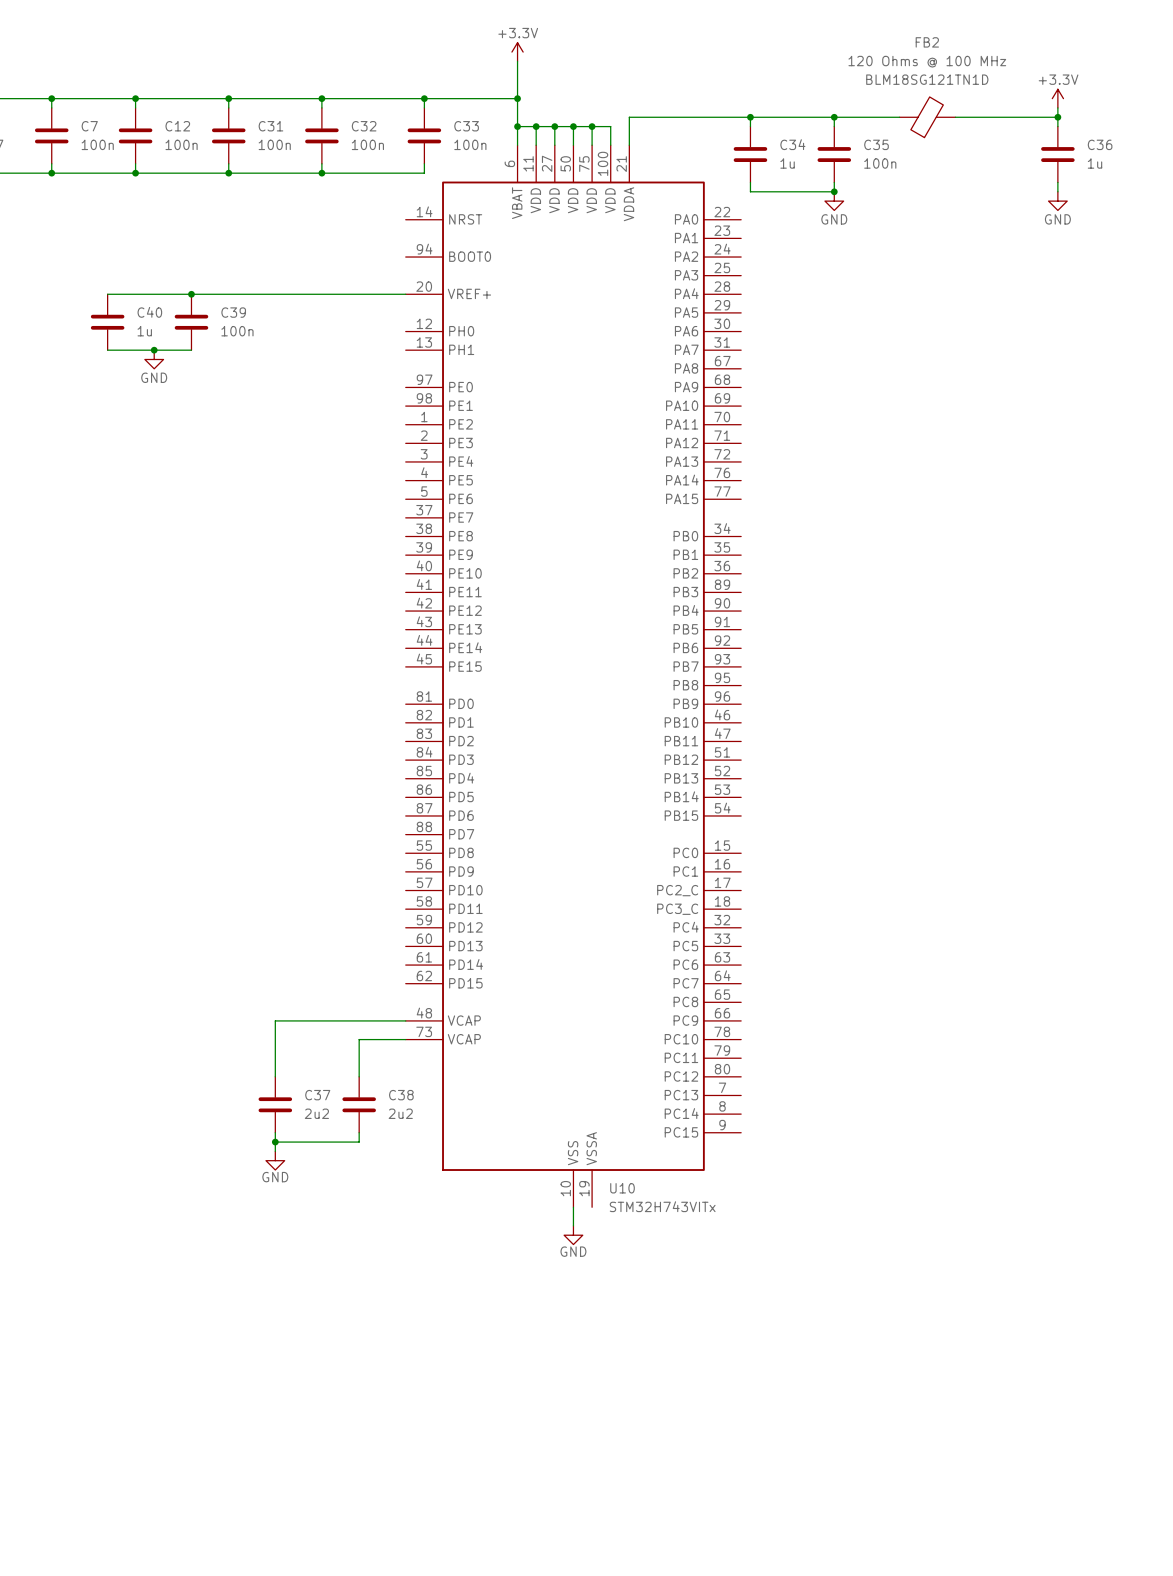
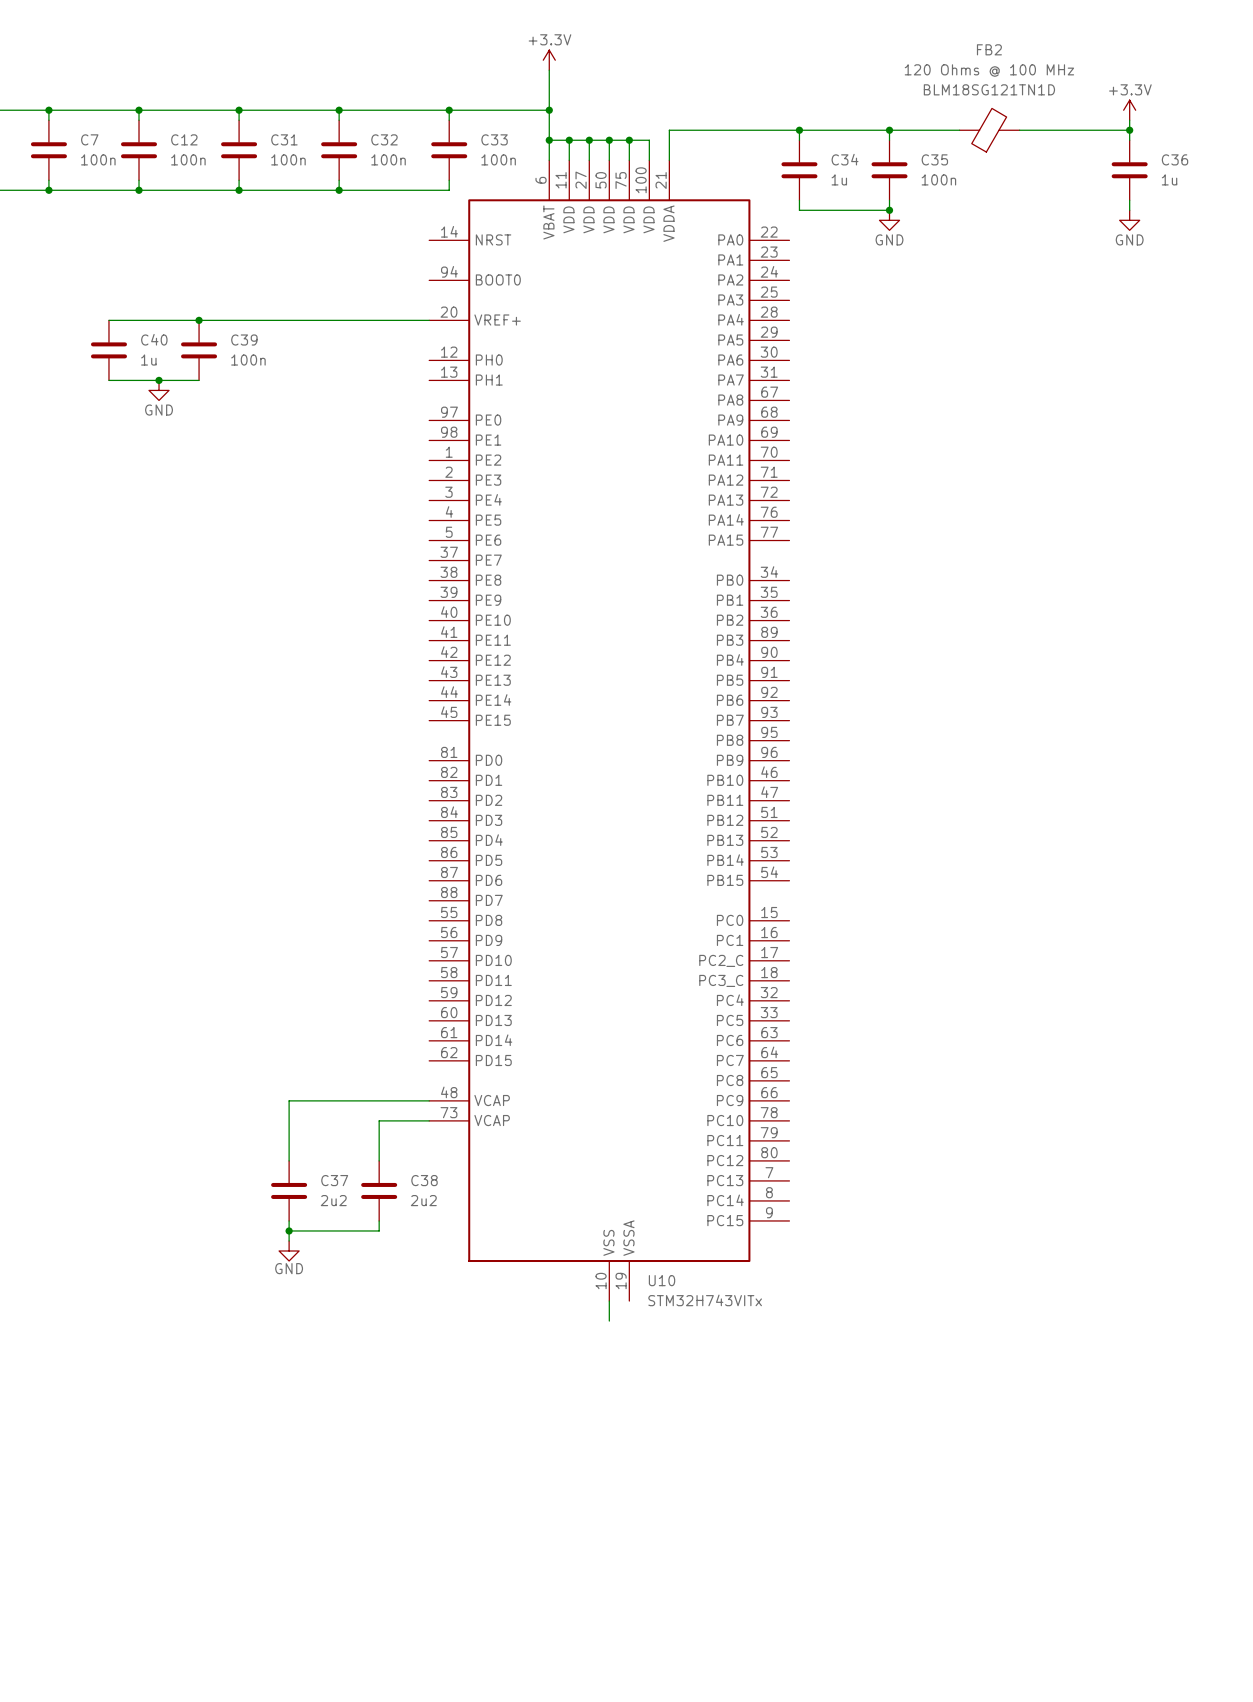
power symbol: GND (573, 1235) -> none

